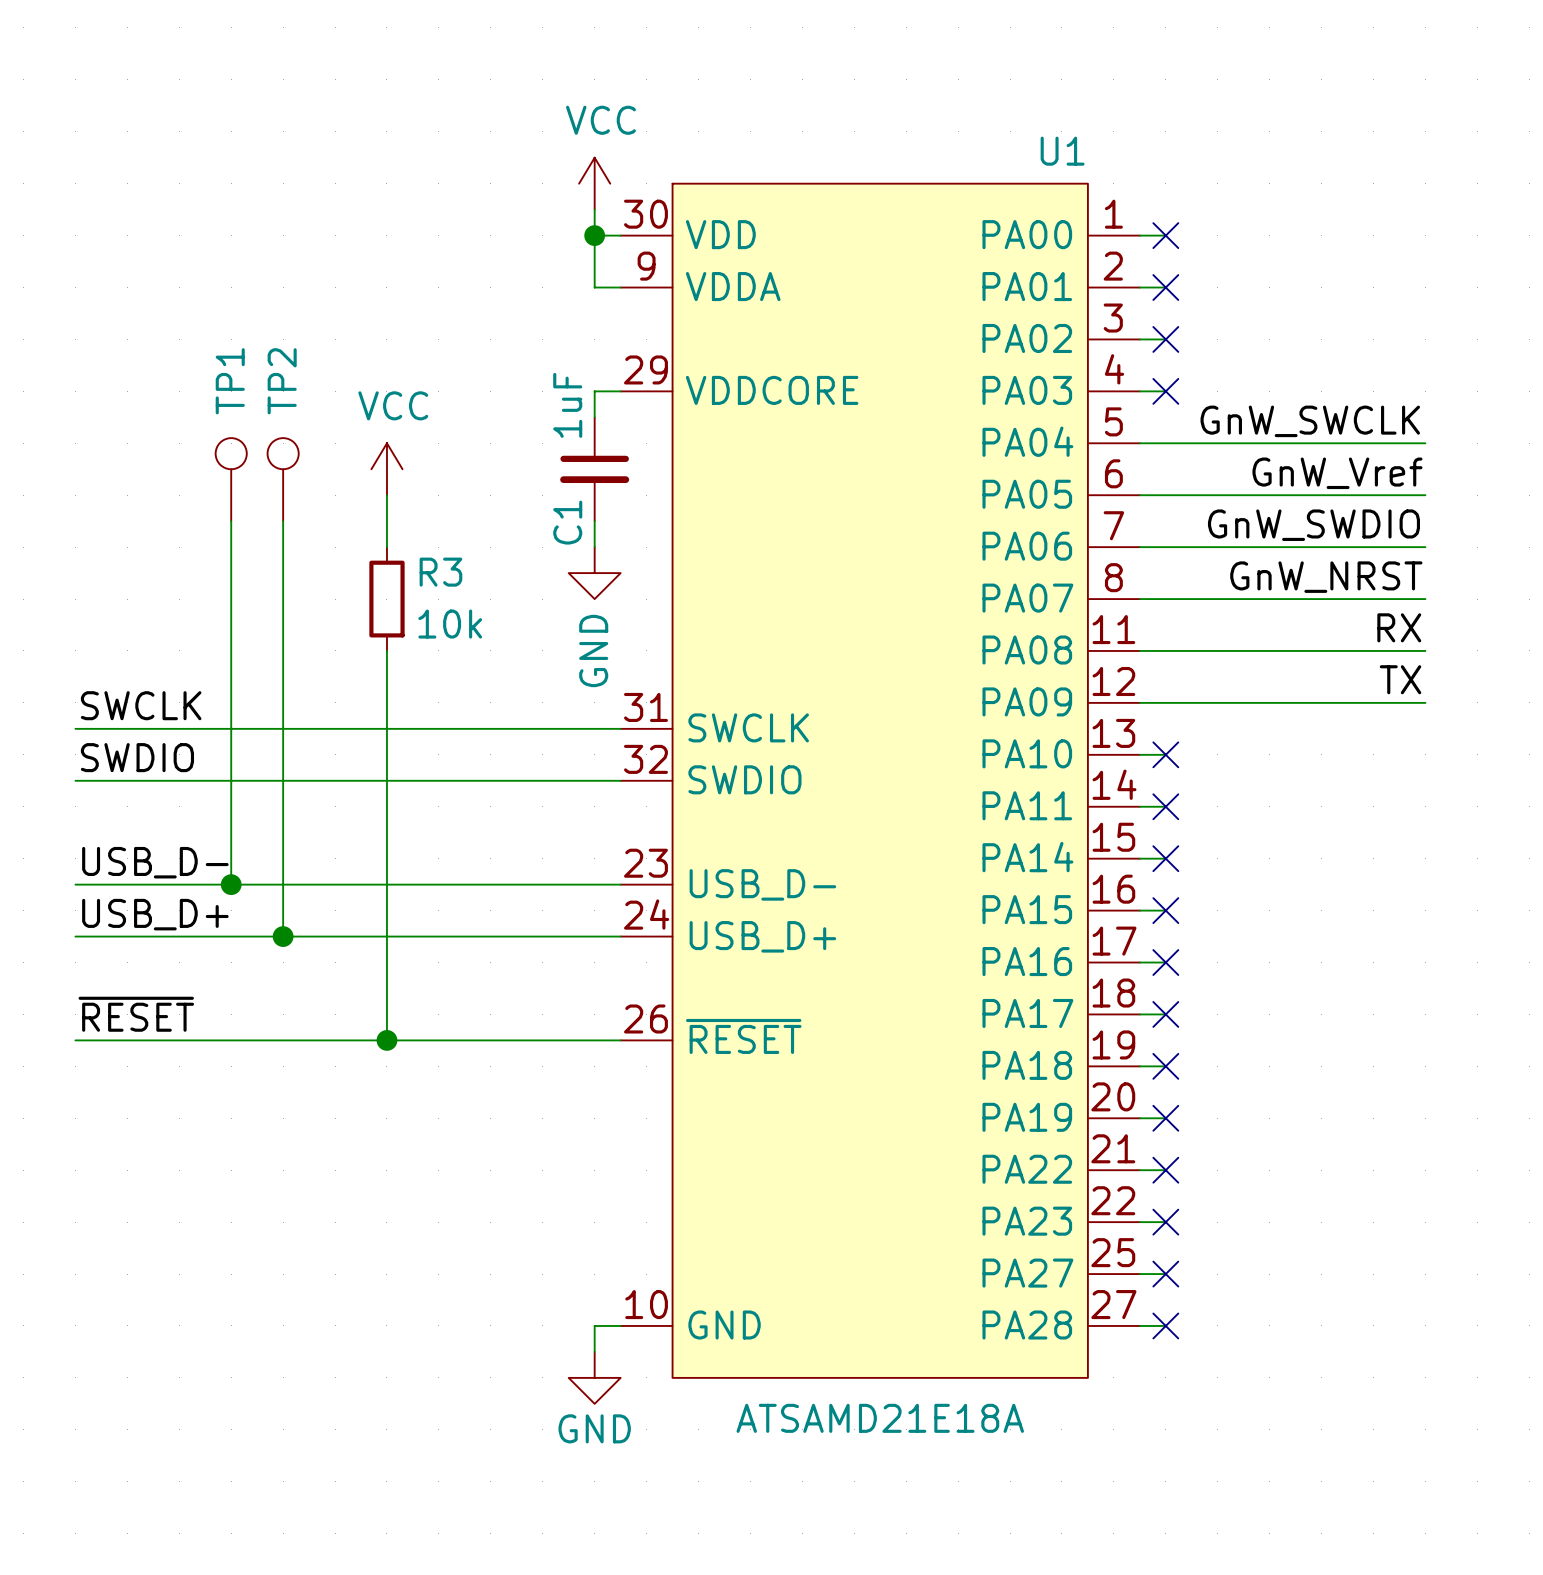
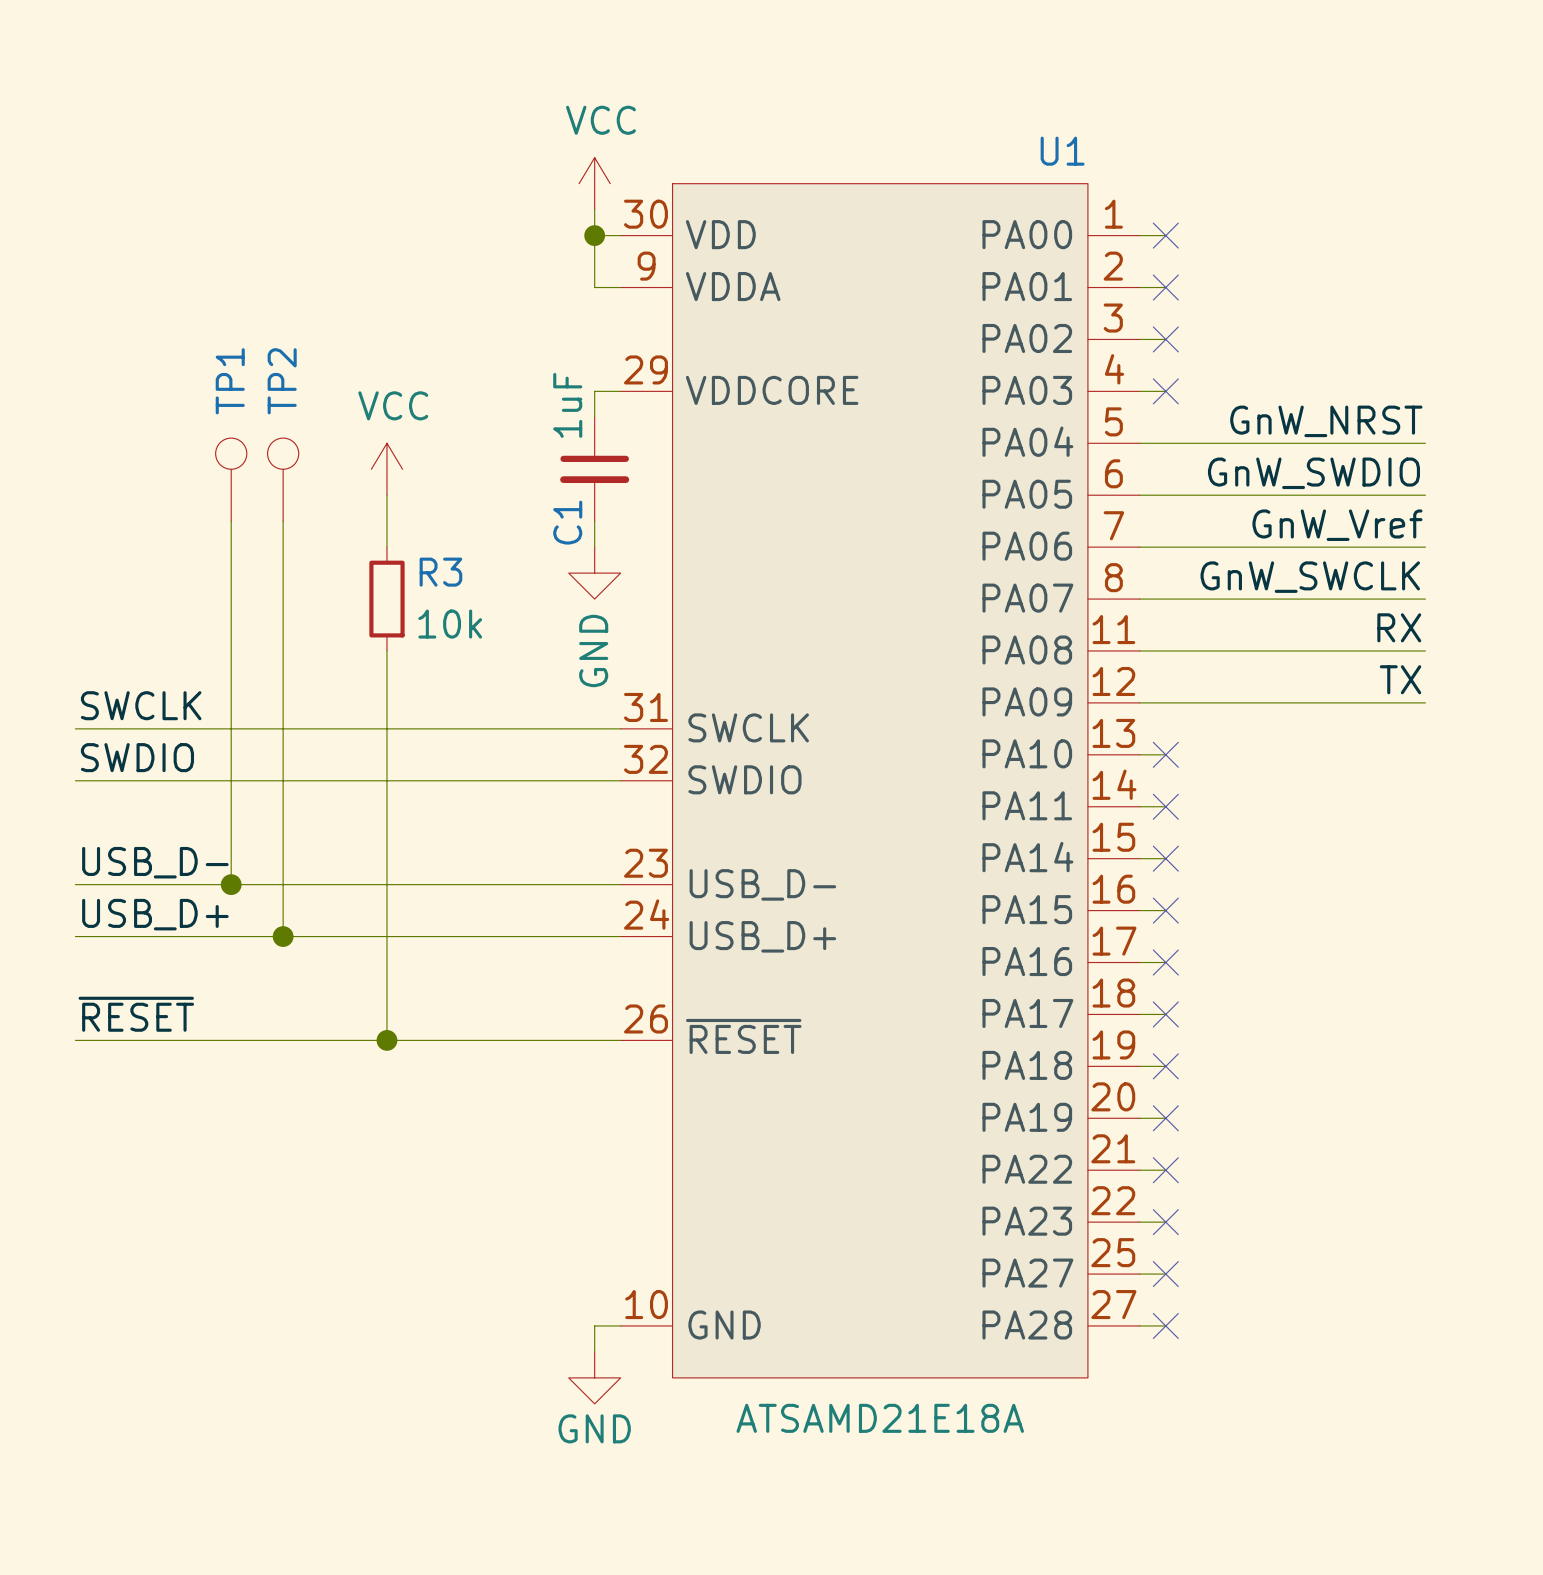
label: GnW_SWCLK (1310, 421) -> GnW_NRST (1326, 421)
label: GnW_Vref (1337, 473) -> GnW_SWDIO (1313, 473)
label: GnW_SWDIO (1313, 525) -> GnW_Vref (1337, 525)
label: GnW_NRST (1326, 577) -> GnW_SWCLK (1310, 577)

